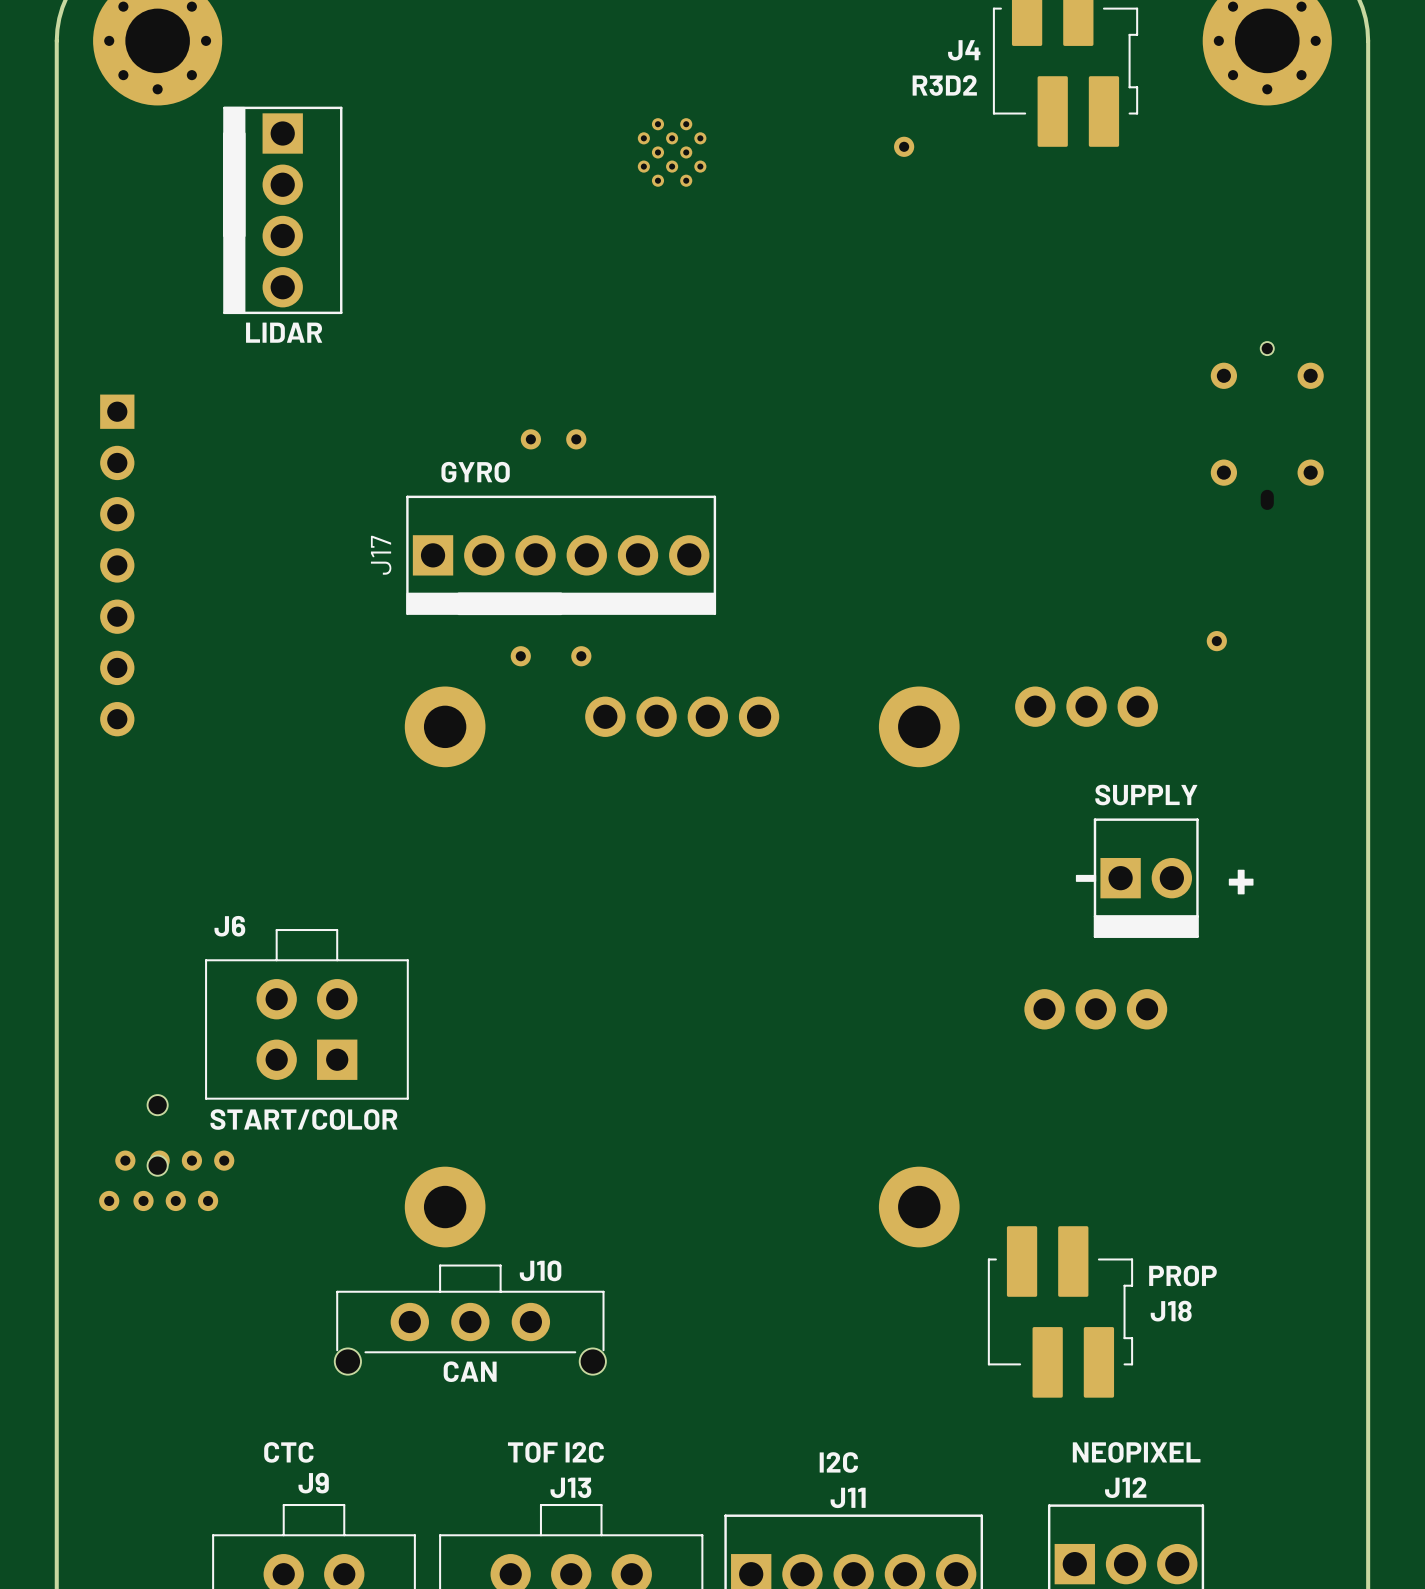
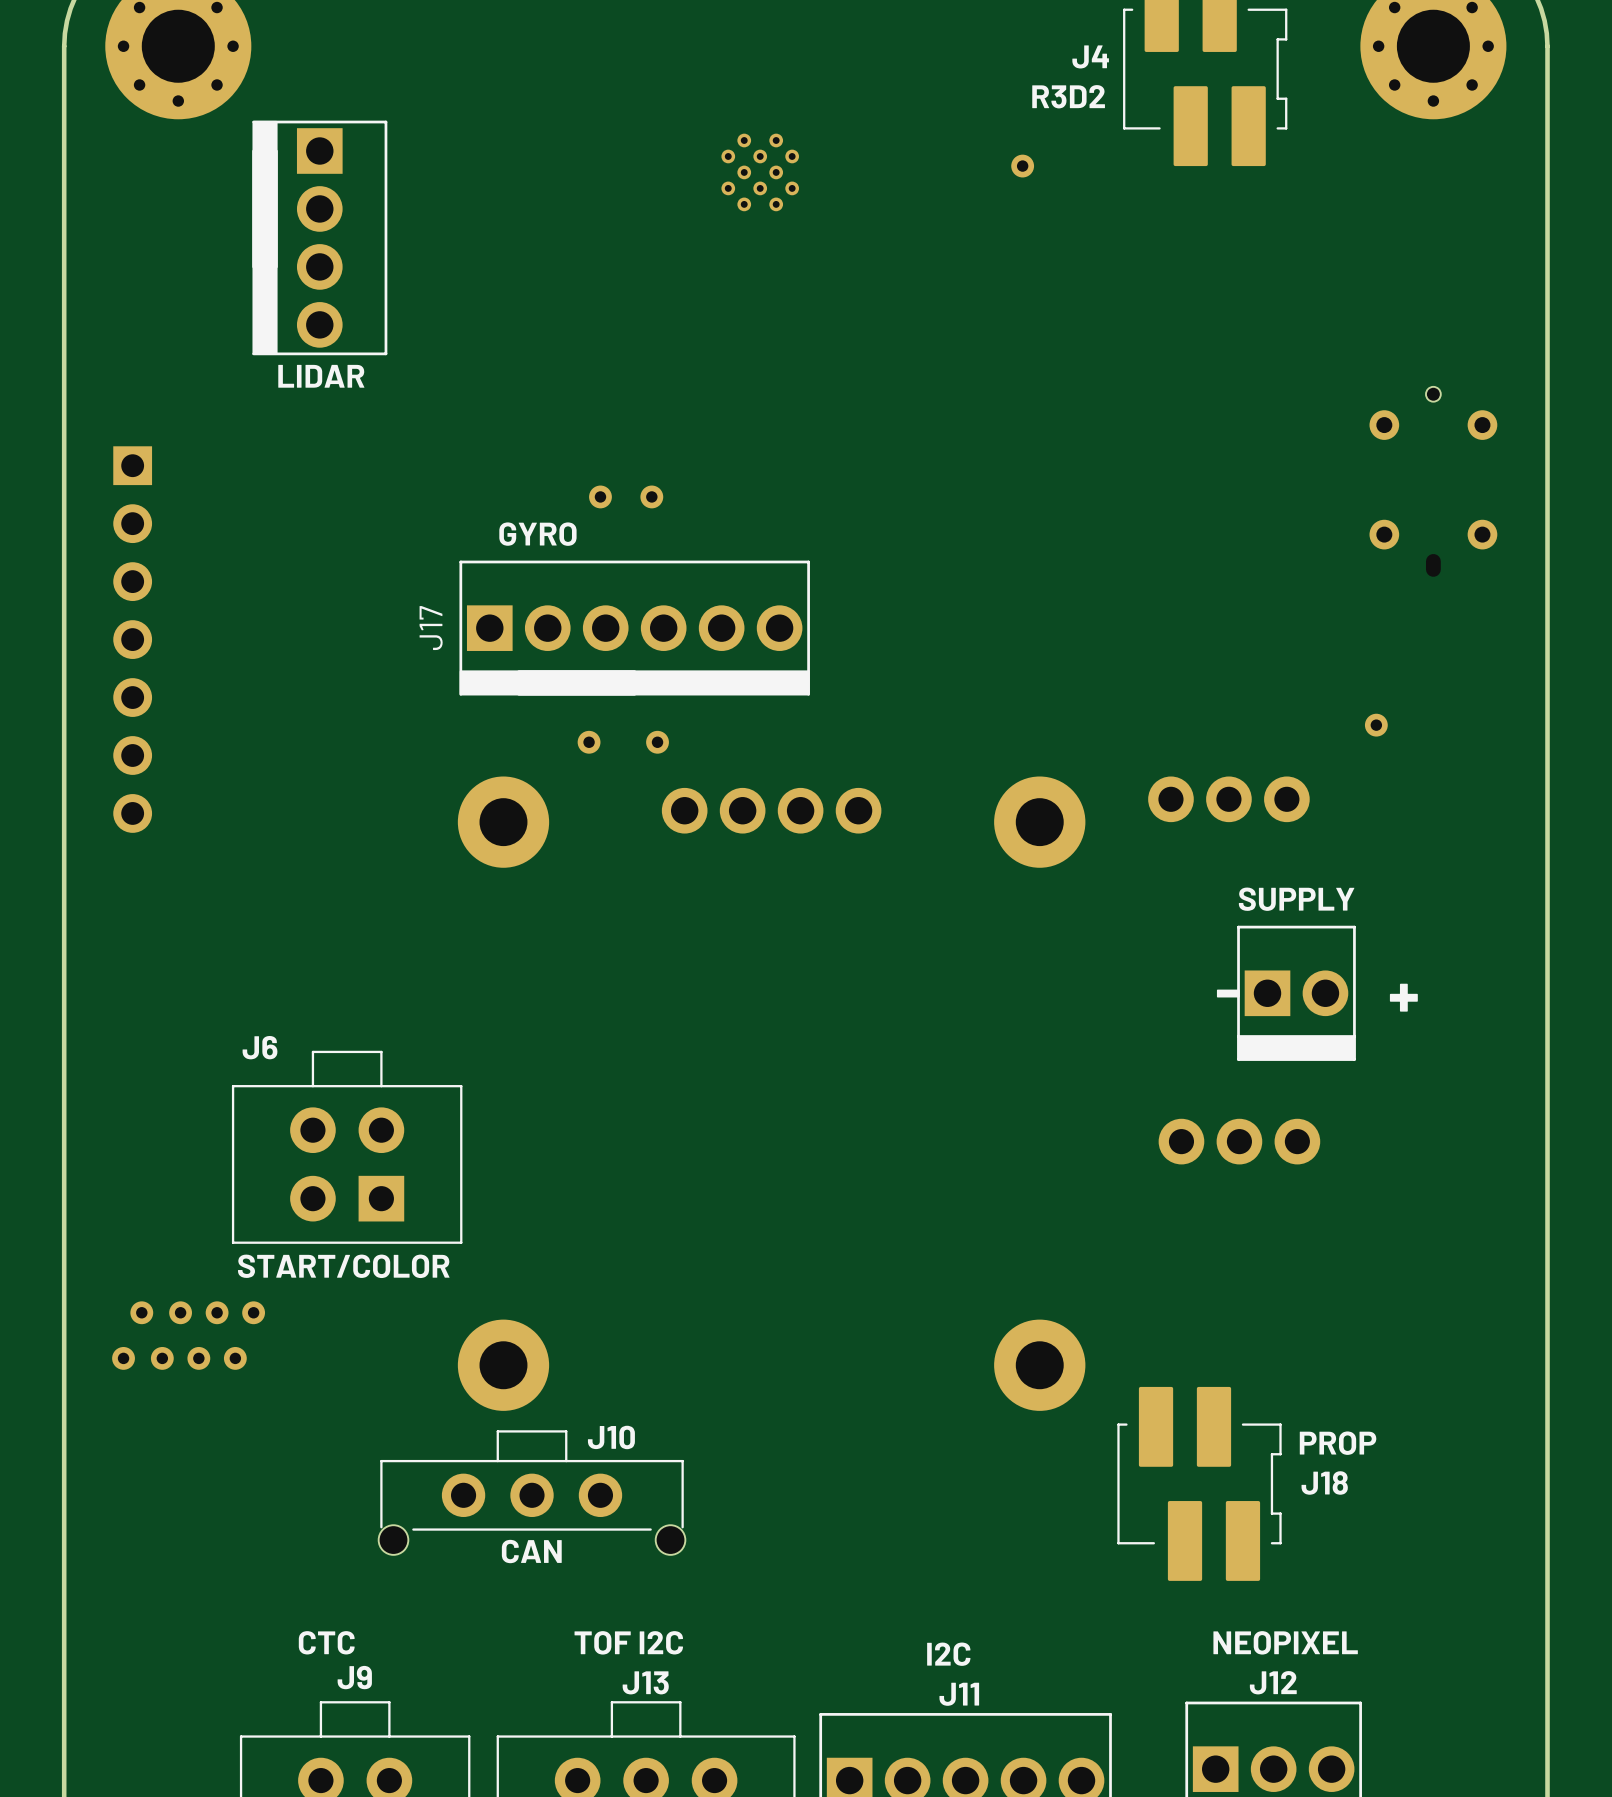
part: (157, 1135) -> none

